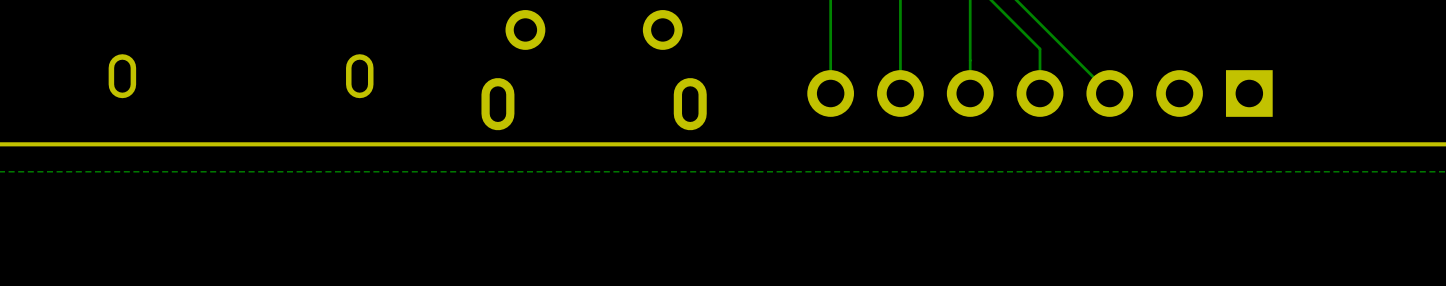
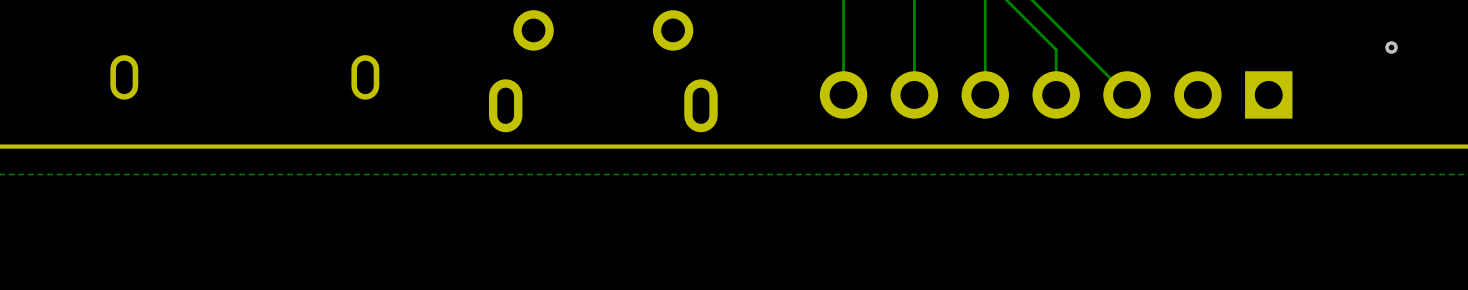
via: none -> (1391, 47)

